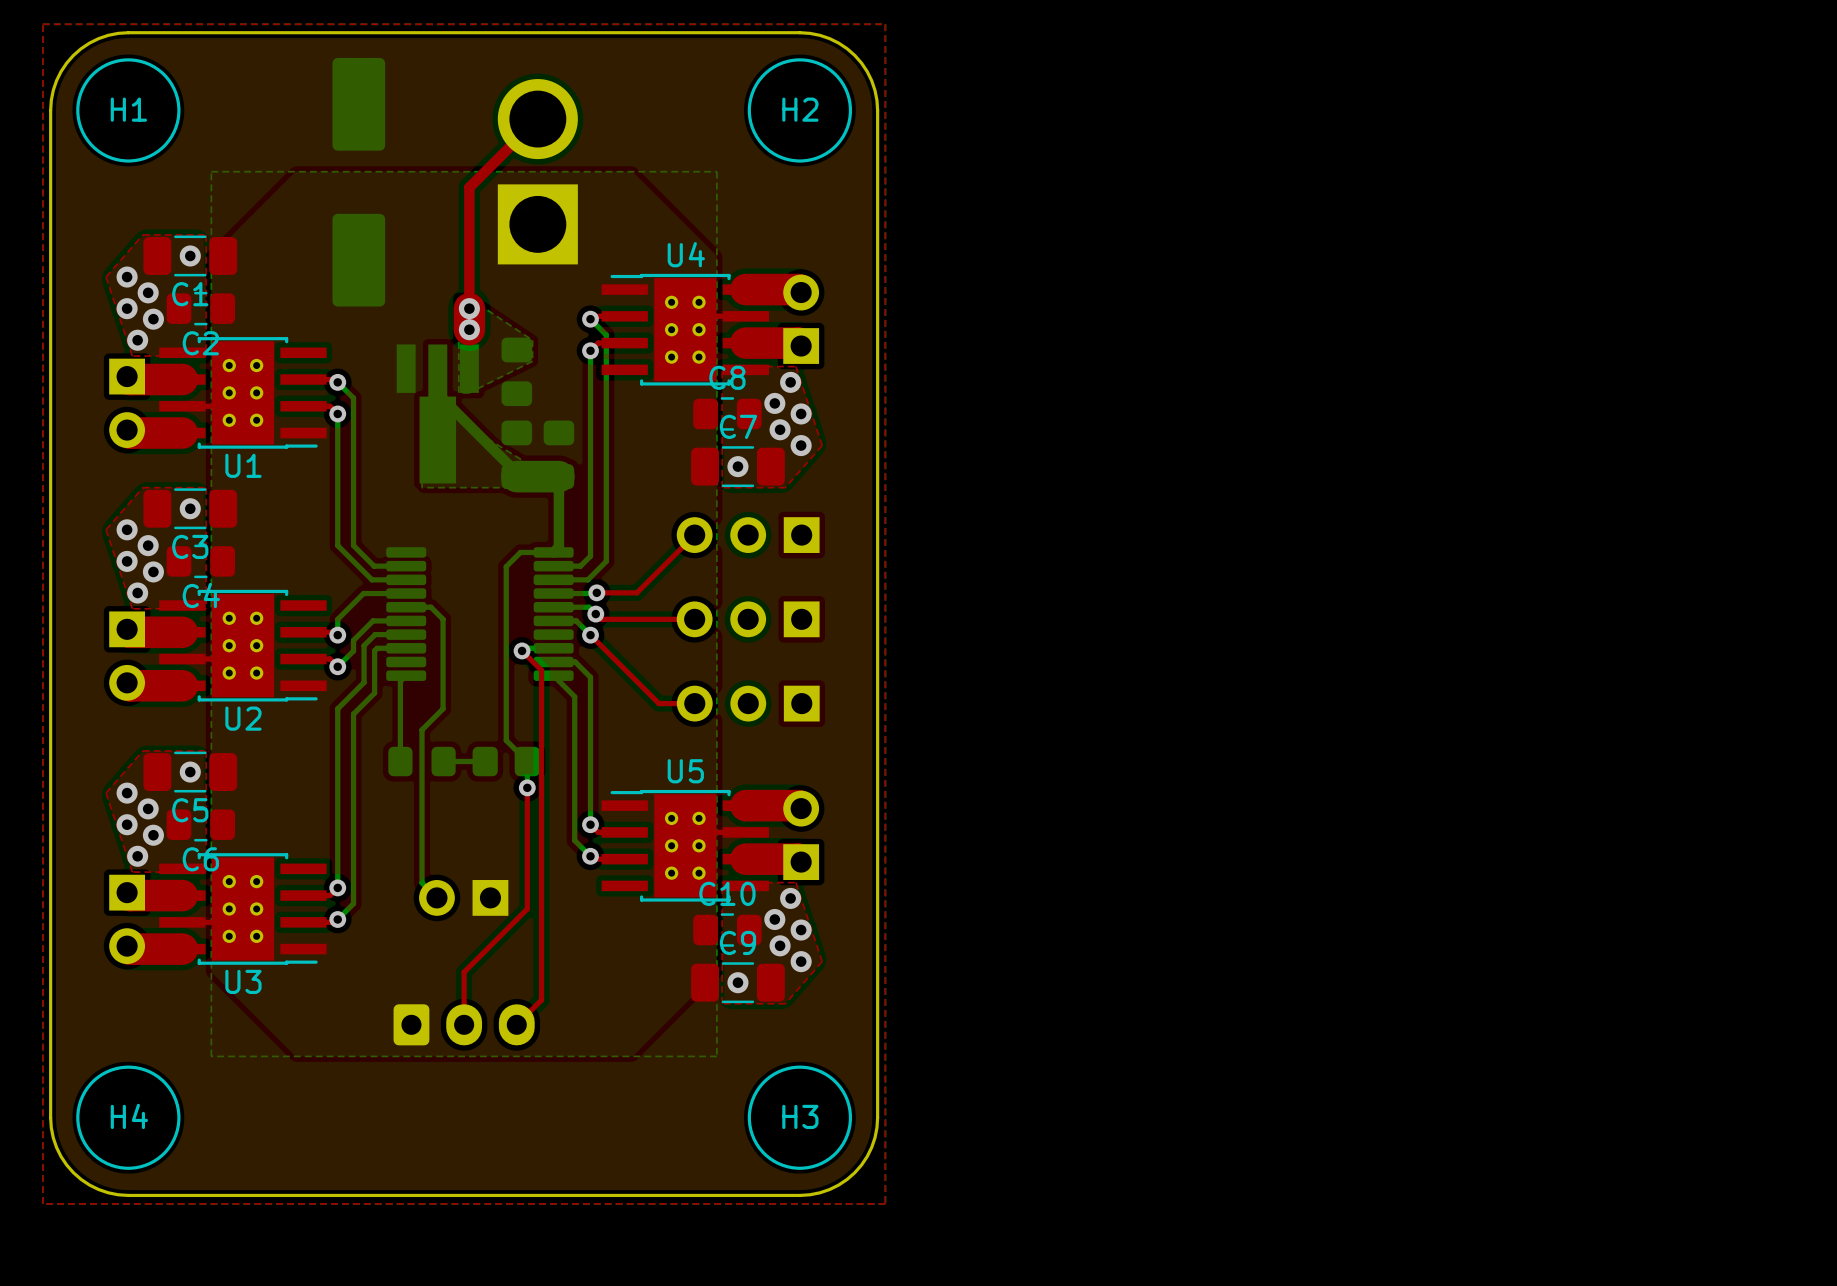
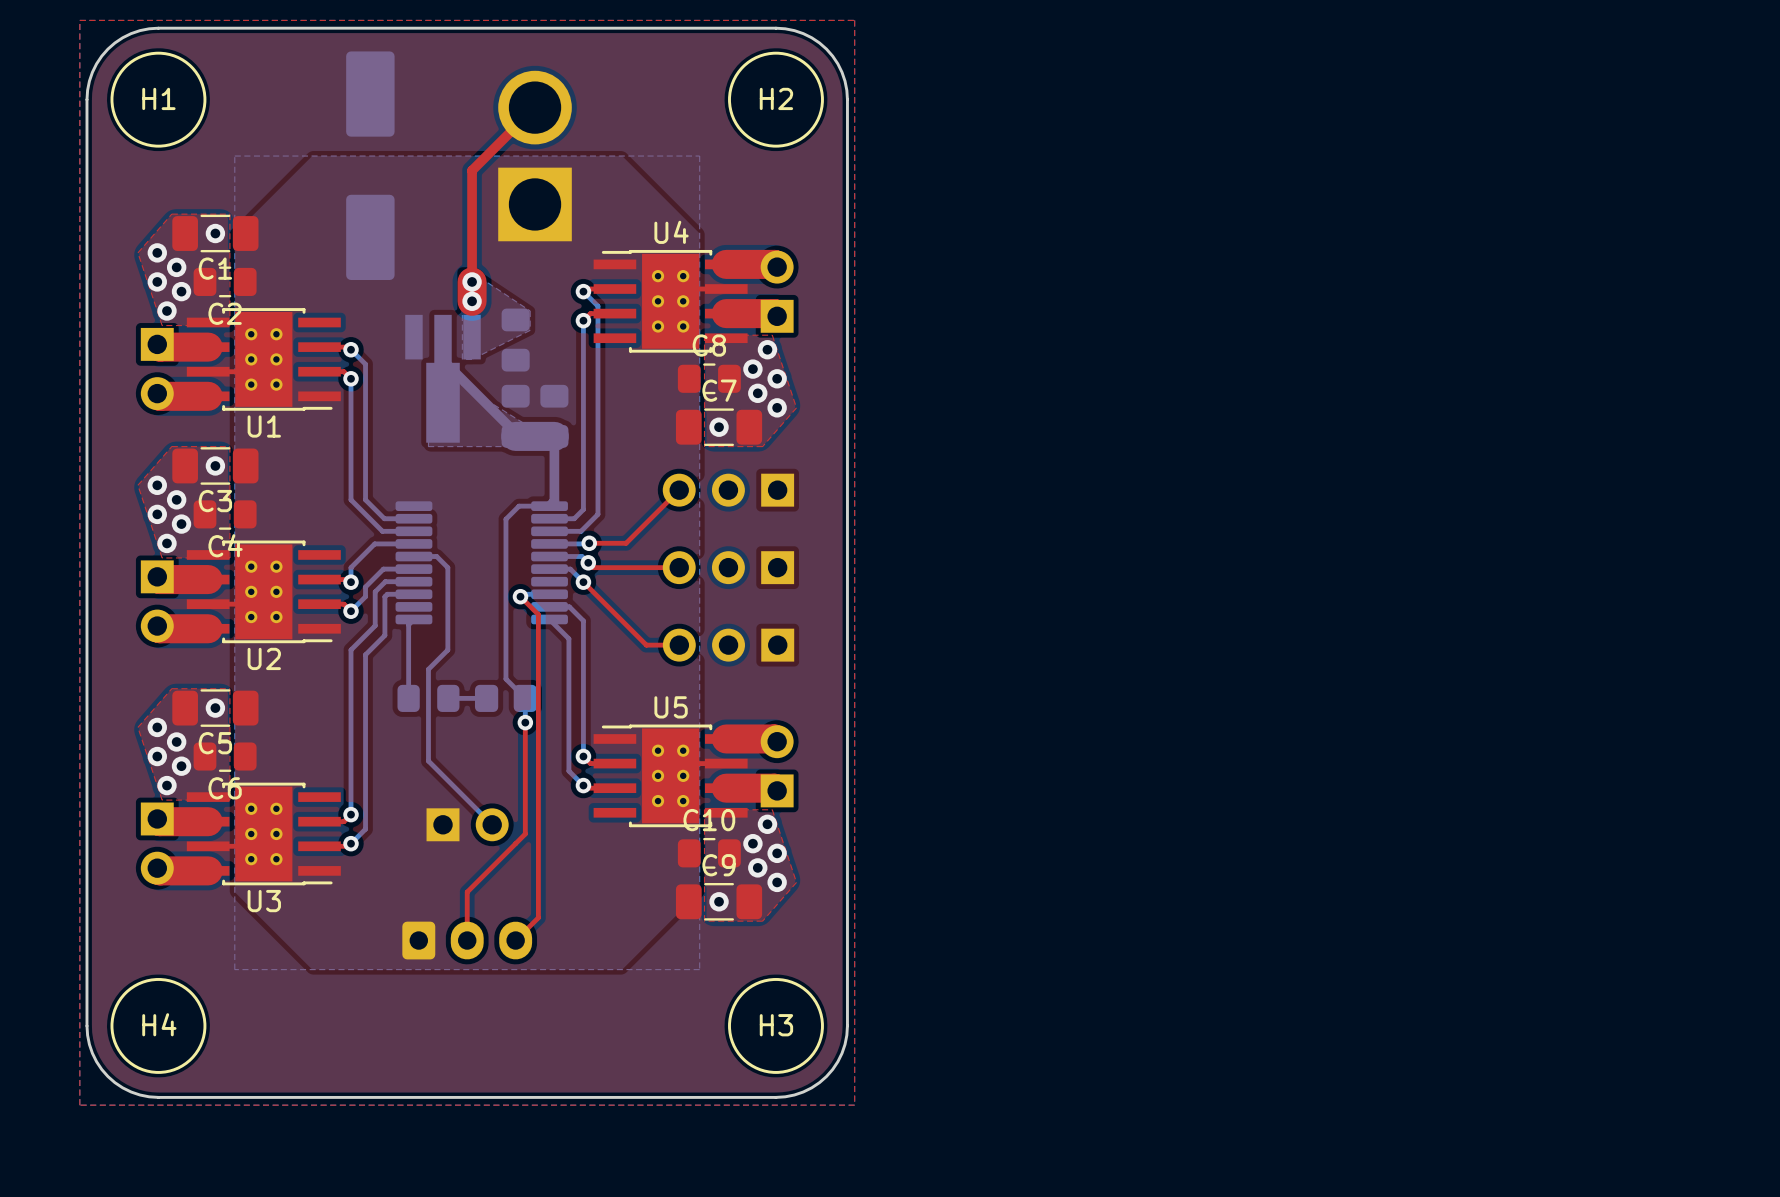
bottom track: (422, 829) (422, 882) (436, 897) -> (428, 761) (492, 824)
part rotation: 0° (463, 897) -> 180° (467, 824)

